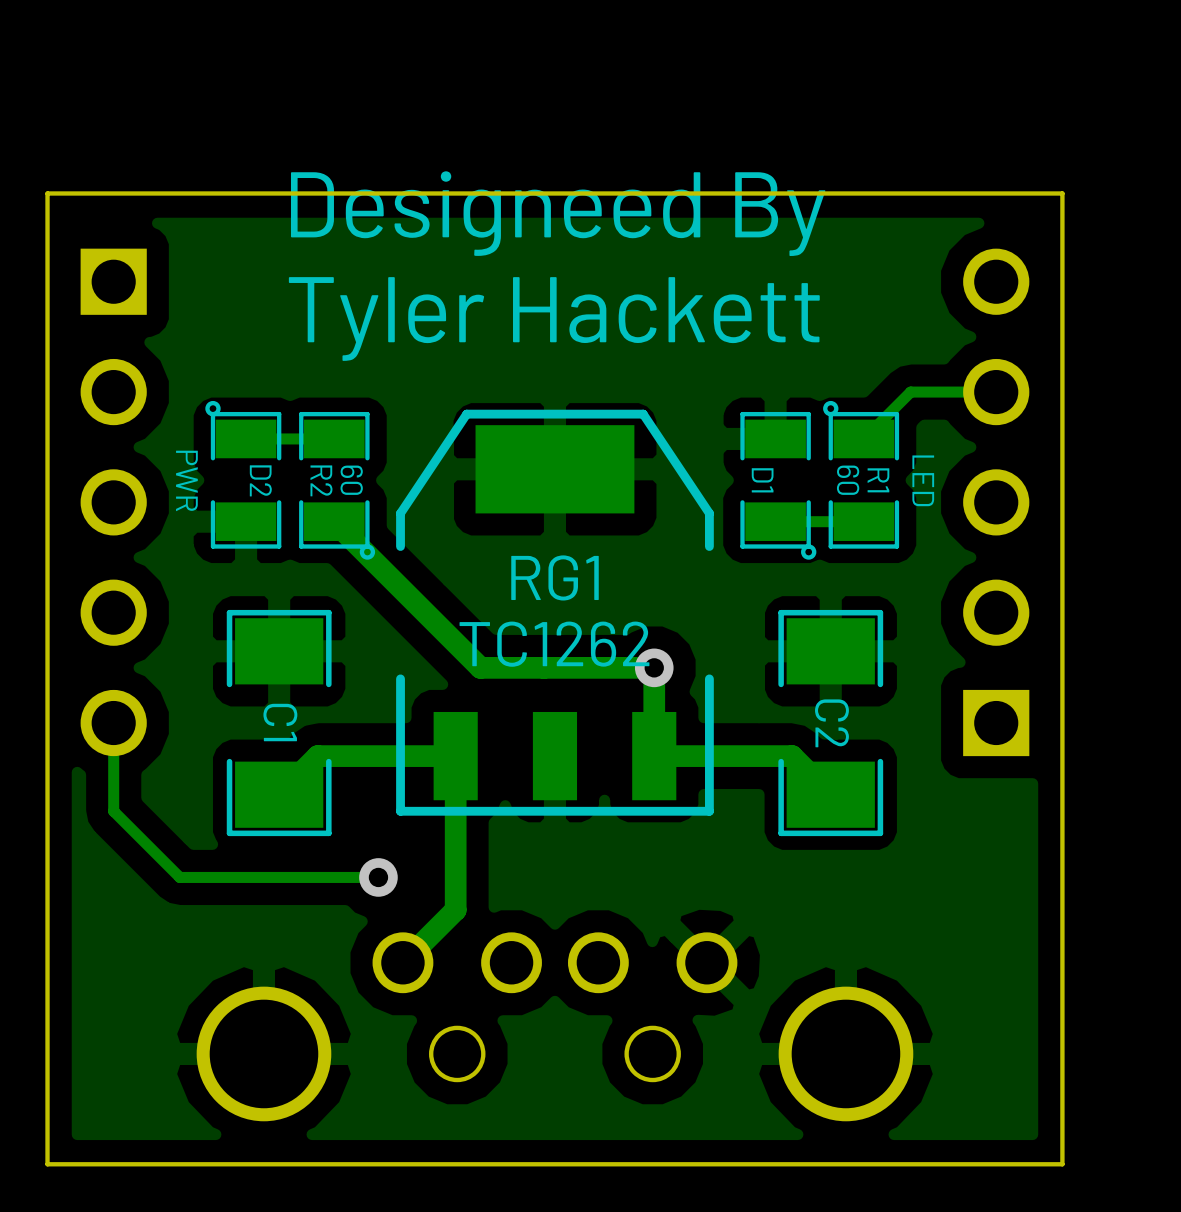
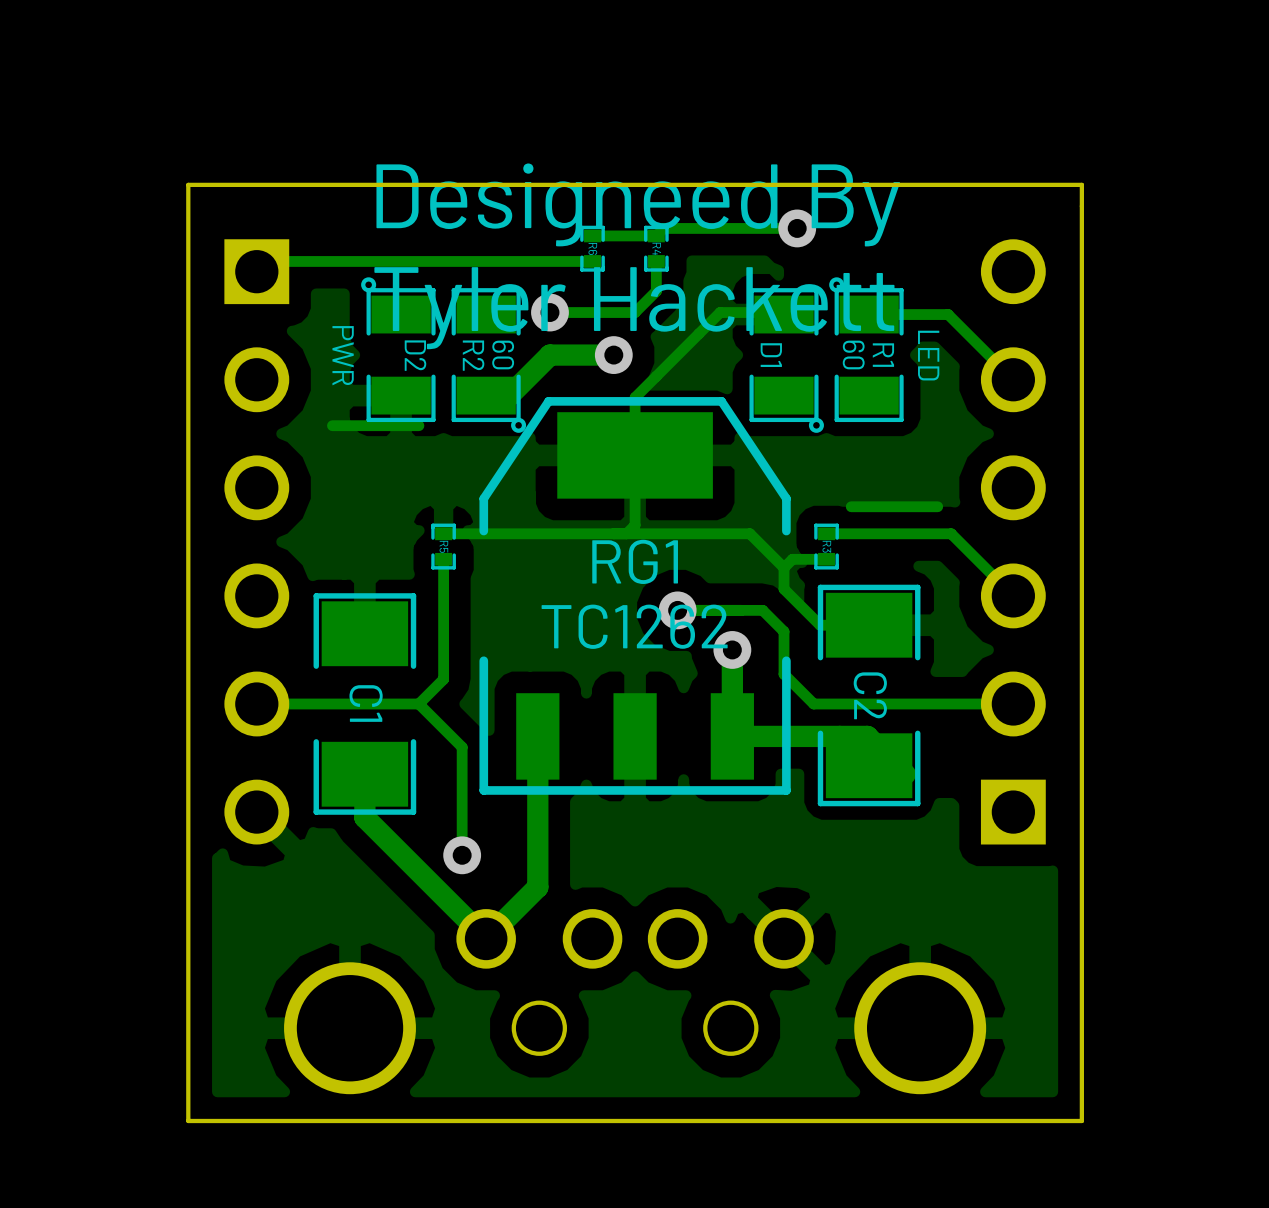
board edge: (1062, 193) (1062, 1164) (47, 1164) (47, 193) (1062, 193) -> (1081, 184) (1081, 1120) (188, 1120) (188, 184) (1081, 184)
track: none -> (797, 228) (663, 228) (656, 235) (592, 235)
via: none -> (797, 228)
R6: none -> (592, 248)
R4: none -> (656, 248)
track: none -> (592, 261) (267, 261) (256, 271)
track: none -> (656, 261) (656, 291) (635, 312) (549, 312)
via: none -> (549, 312)
track: none -> (784, 314) (781, 312) (720, 312) (635, 397) (635, 525) (626, 533)
track: none -> (869, 314) (948, 314) (1013, 379)
track: none -> (613, 355) (549, 355) (509, 395) (486, 395)
via: none -> (613, 355)
track: (996, 392) (910, 392) (863, 438) -> none
D2 position: (243, 474) -> (398, 349)
R1 position: (861, 474) -> (866, 349)
R2 position: (337, 485) -> (488, 360)
D1 position: (778, 485) -> (786, 360)
part: (113, 502) -> none
part: (996, 502) -> none
track: (334, 521) (480, 667) (654, 667) -> none
track: none -> (443, 533) (749, 533) (784, 567)
track: none -> (826, 533) (951, 533) (1013, 595)
part: none -> (256, 541)
part: none -> (1013, 541)
R5: none -> (443, 546)
R3: none -> (826, 546)
track: none -> (443, 559) (443, 679) (418, 703)
track: none -> (826, 559) (792, 559) (784, 567)
track: none -> (784, 567) (784, 589) (820, 625) (869, 625)
track: none -> (677, 610) (762, 610) (784, 631) (784, 674) (813, 703) (1013, 703)
via: none -> (677, 610)
track: (113, 723) (113, 811) (179, 877) (378, 877) -> (418, 703) (462, 747) (462, 855)
track: none -> (418, 703) (256, 703)
C2 position: (830, 723) -> (869, 695)
track: (455, 756) (317, 756) (279, 794) -> (486, 938) (364, 817) (364, 774)

